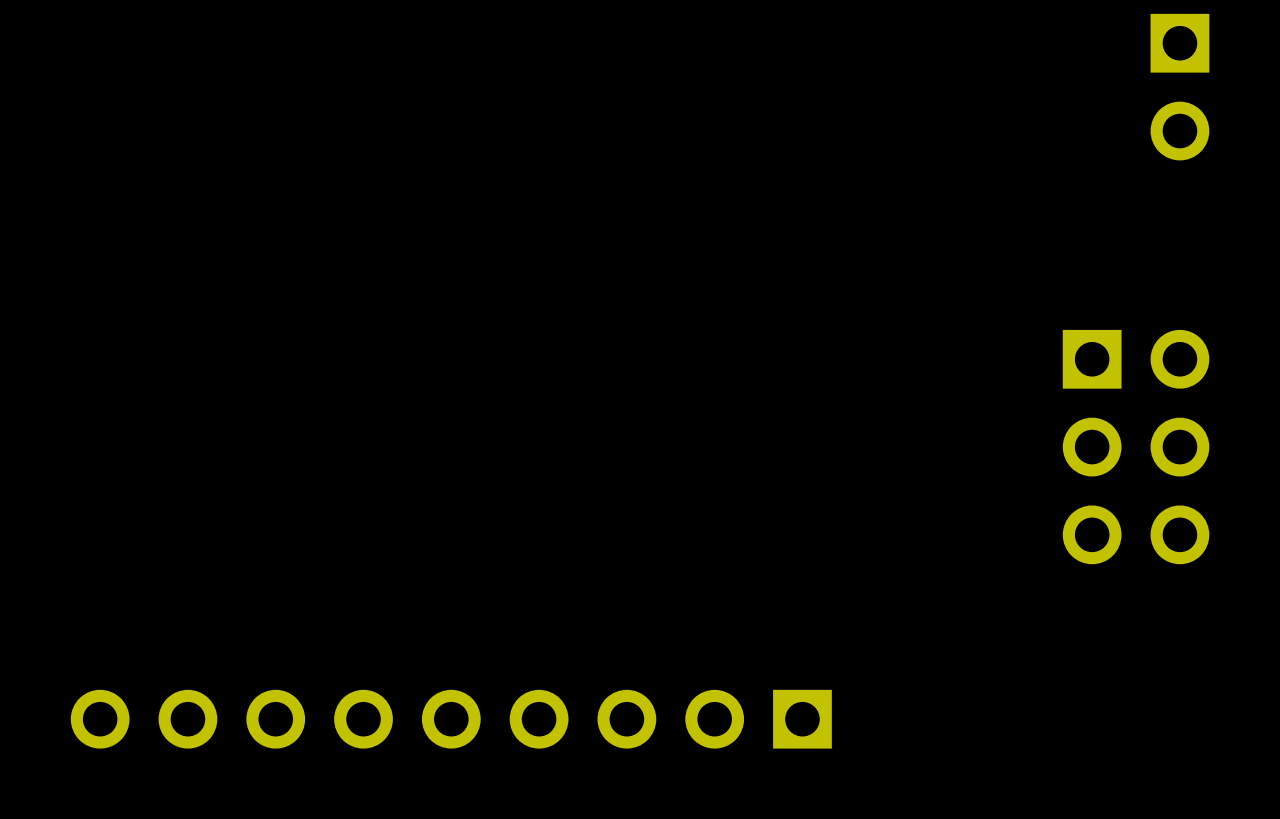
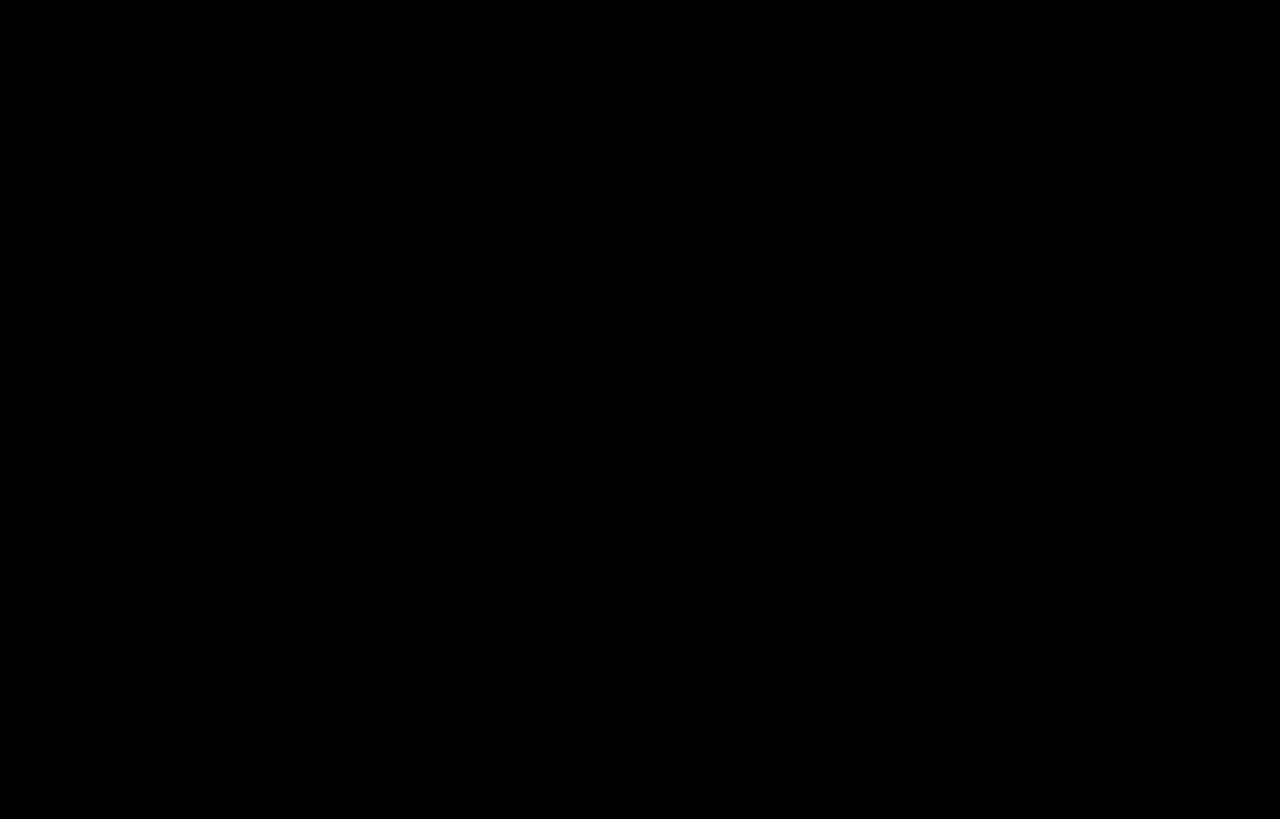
part: (1179, 87) -> none
part: (1136, 447) -> none
part: (451, 719) -> none

